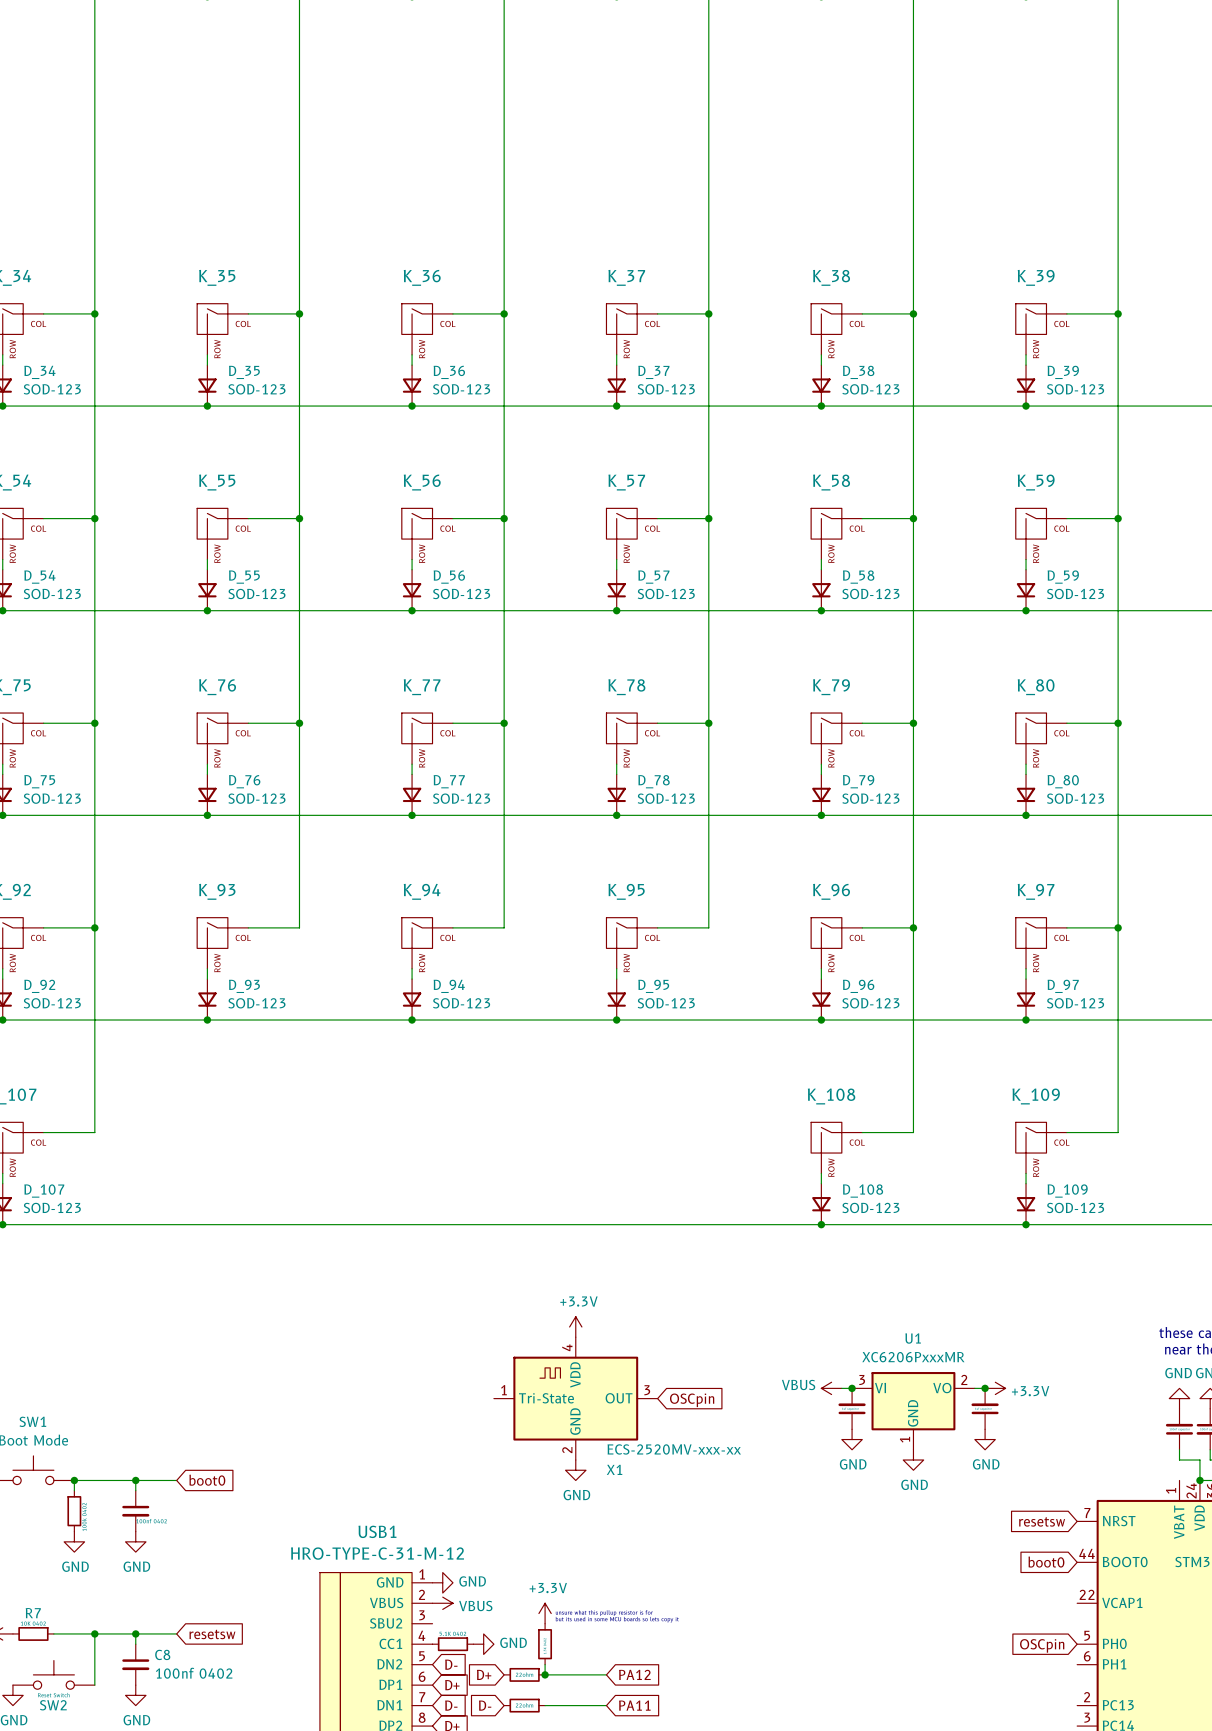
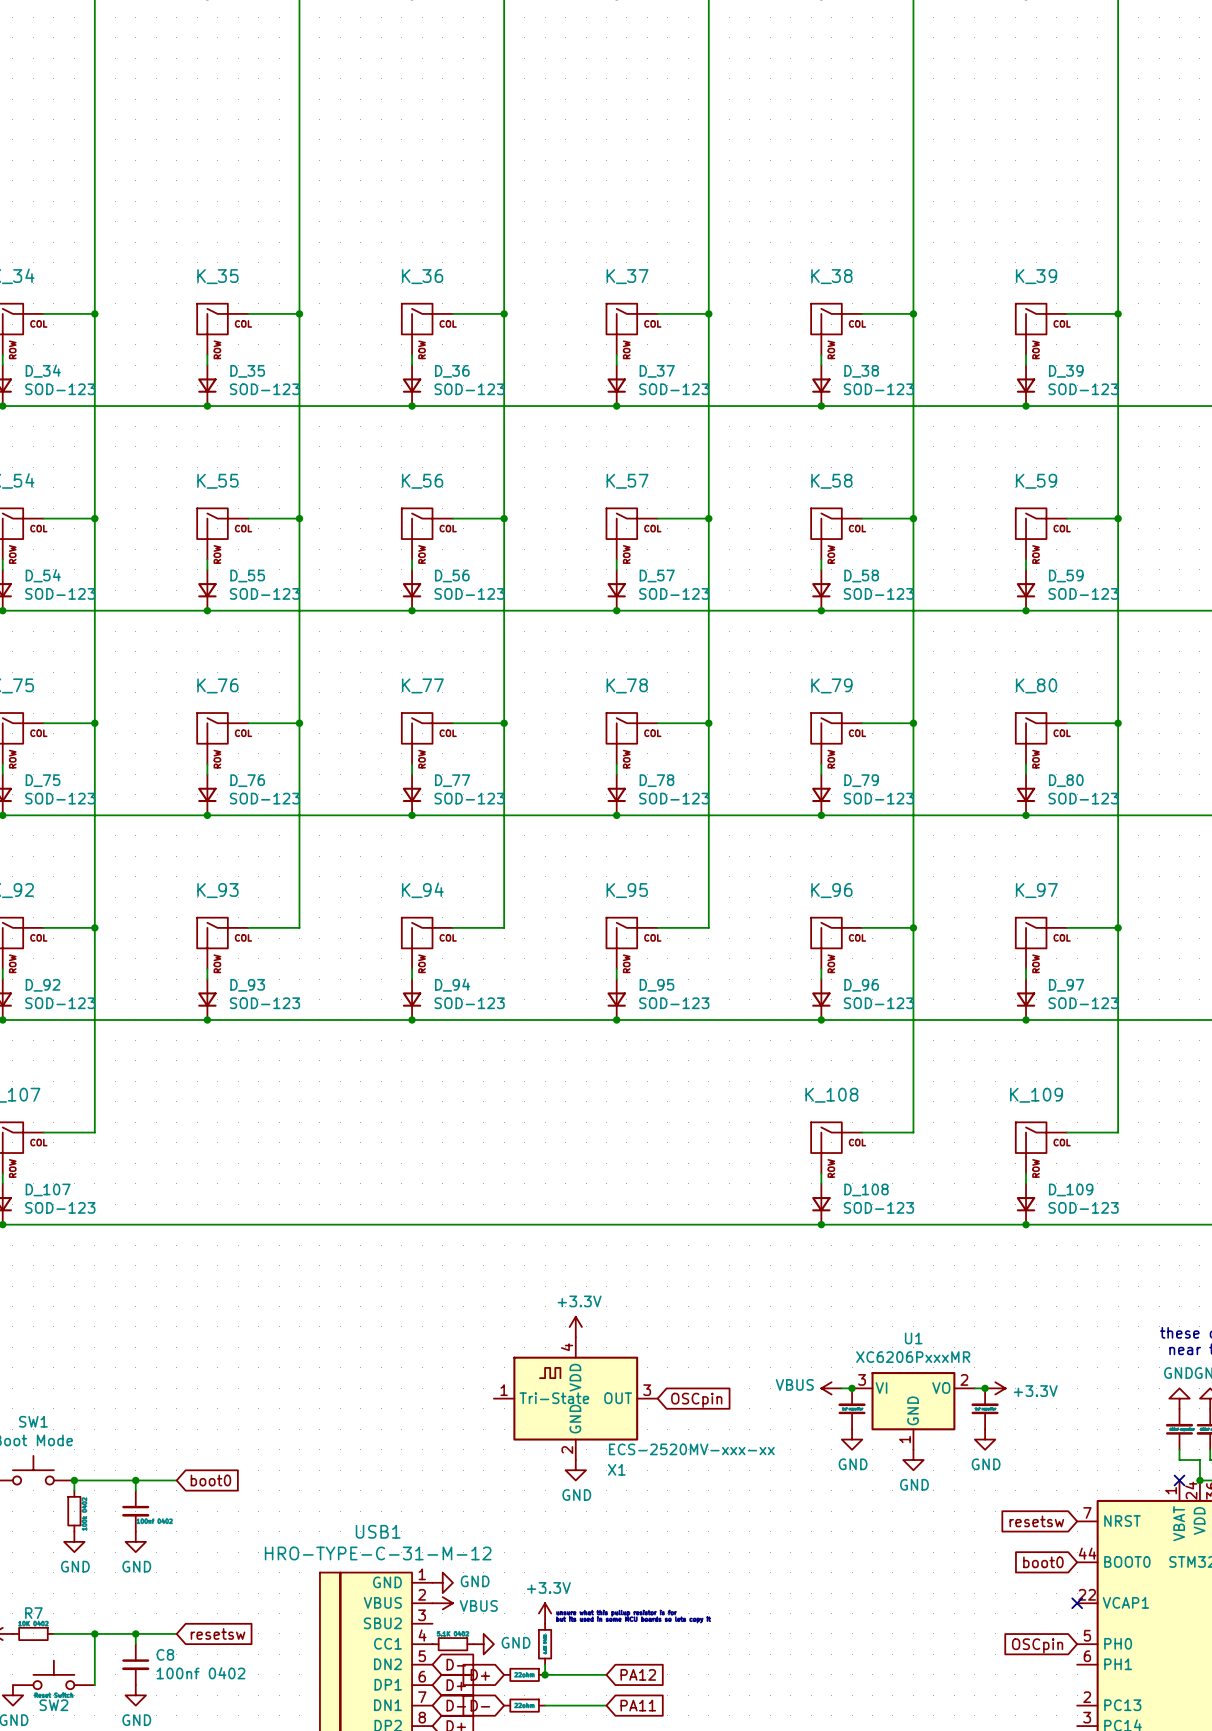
no-connect mark: none -> (1179, 1480)
no-connect mark: none -> (1077, 1603)

